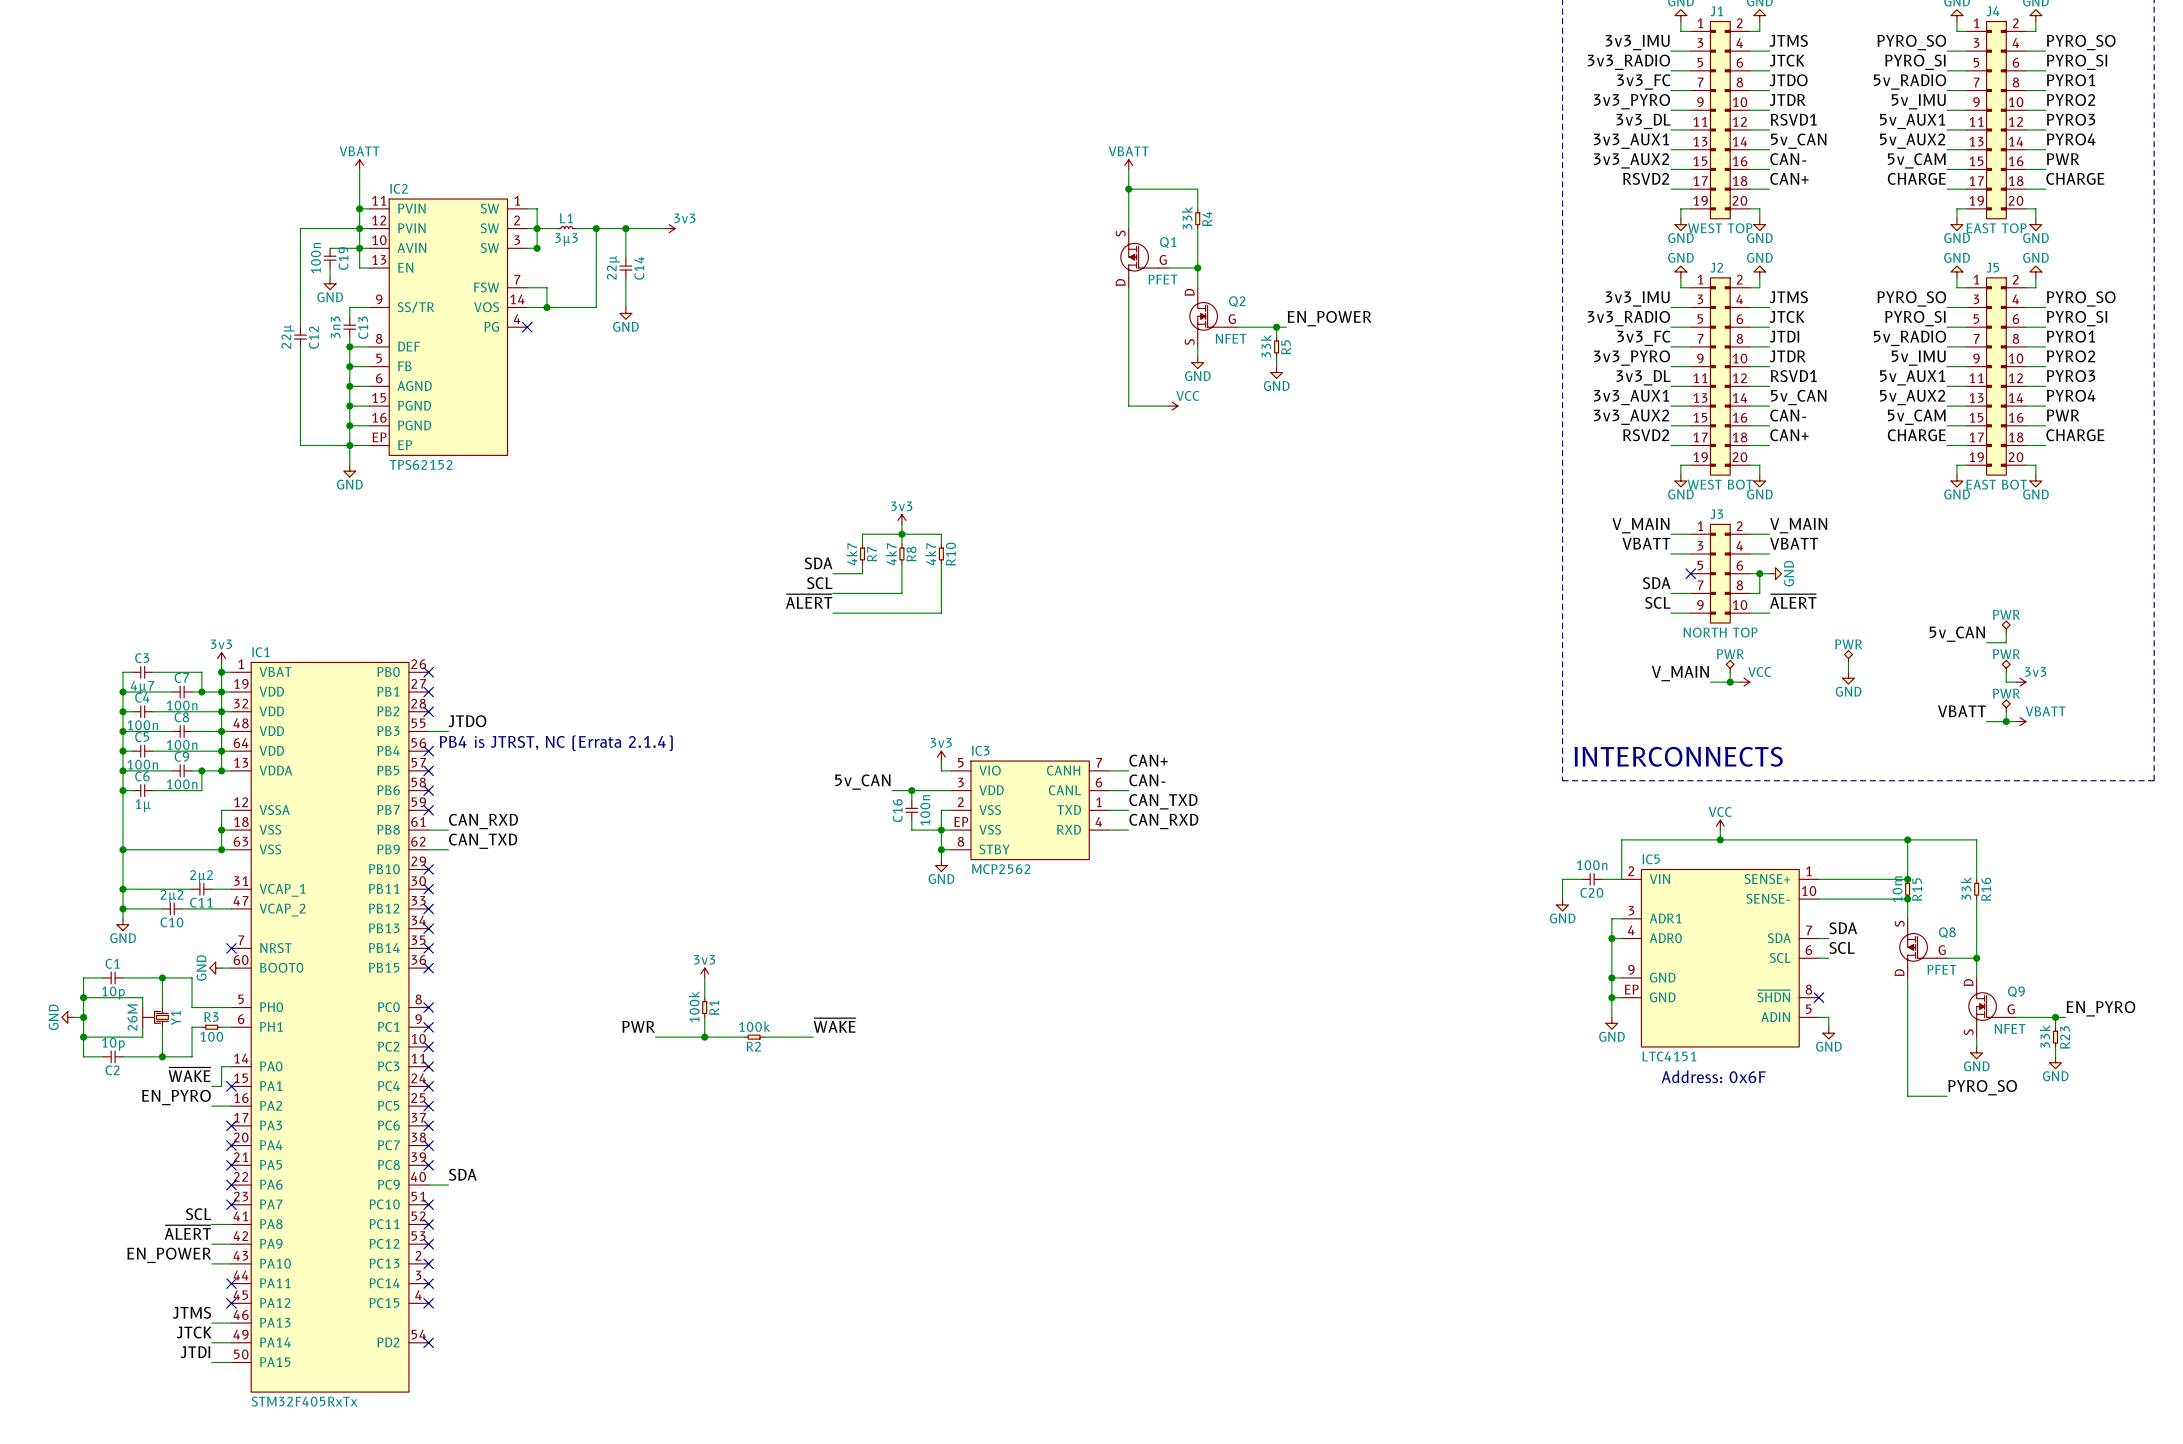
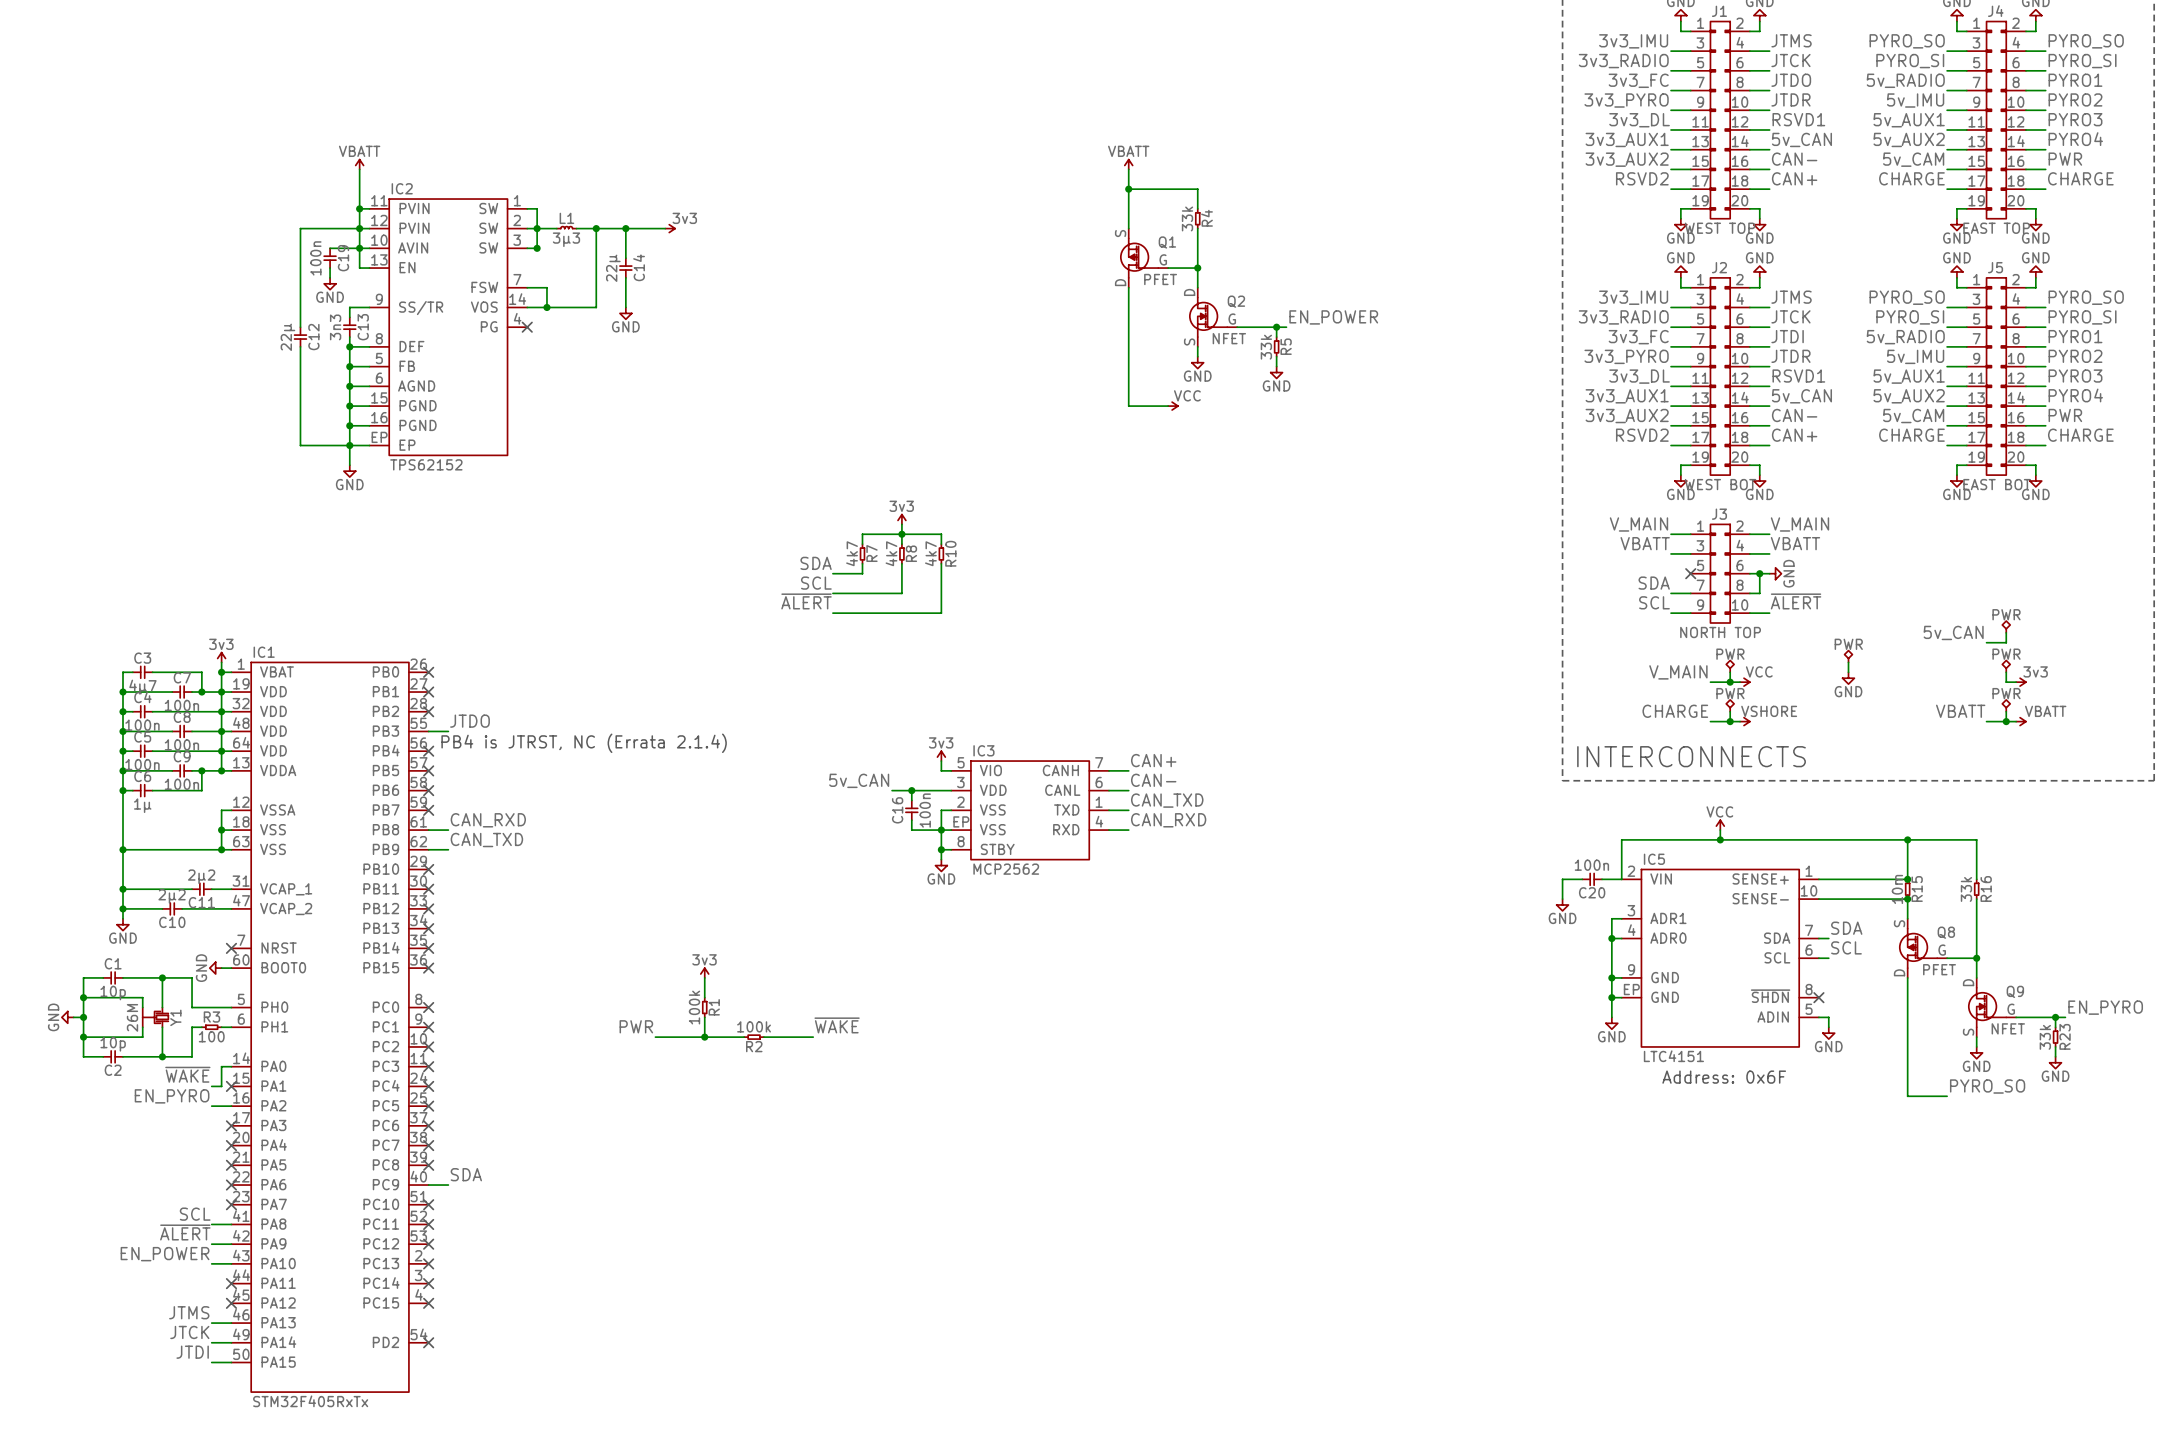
power symbol: none -> PWR (1730, 705)
label: none -> CHARGE (1675, 711)
wire: none -> (1730, 711) (1730, 721)
wire: none -> (1710, 721) (1740, 721)
junction: none -> (1730, 721)
power symbol: none -> VSHORE (1744, 721)

